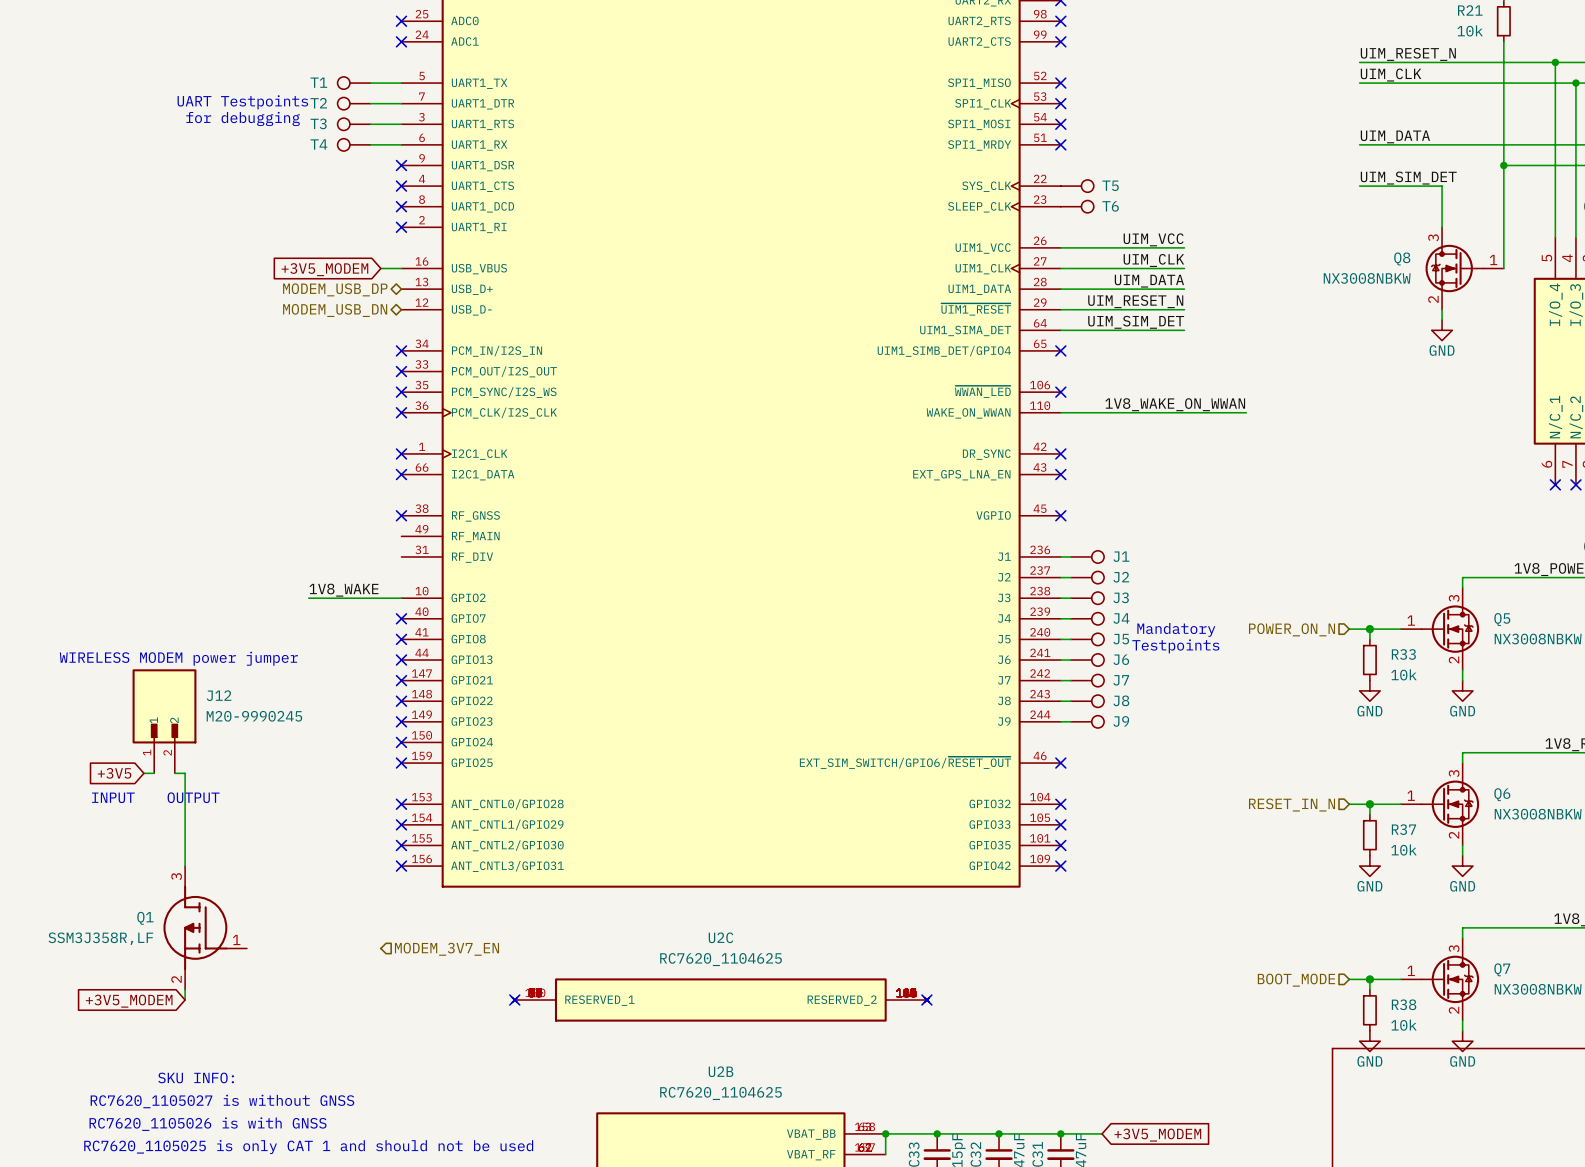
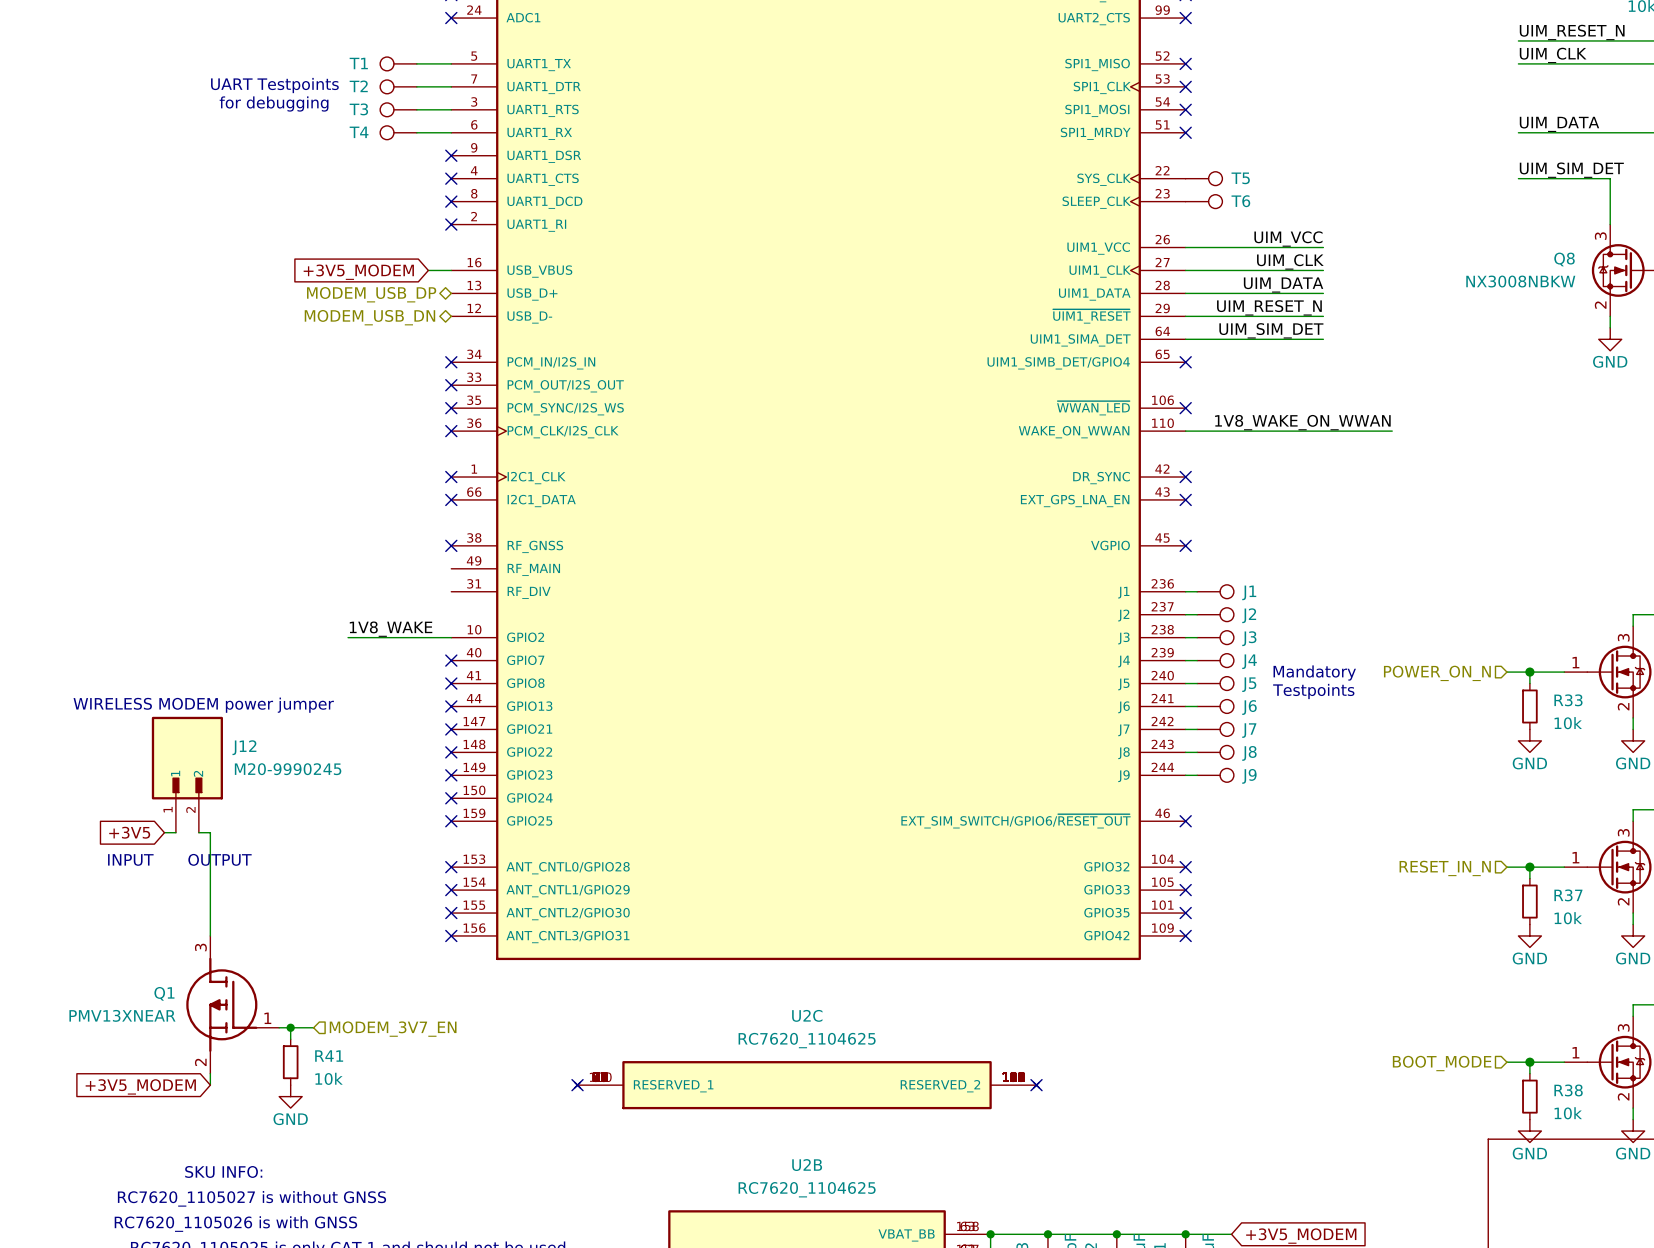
Q1 value: SSM3J358R,LF (100, 938) -> PMV13XNEAR (122, 1015)
wire: none -> (279, 1027) (313, 1027)
wire: none -> (290, 1027) (290, 1039)
junction: none -> (290, 1027)
hierarchical label position: MODEM_3V7_EN (446, 949) -> MODEM_3V7_EN (393, 1029)
R41: none -> 10k (290, 1062)
power symbol: none -> GND (290, 1096)

